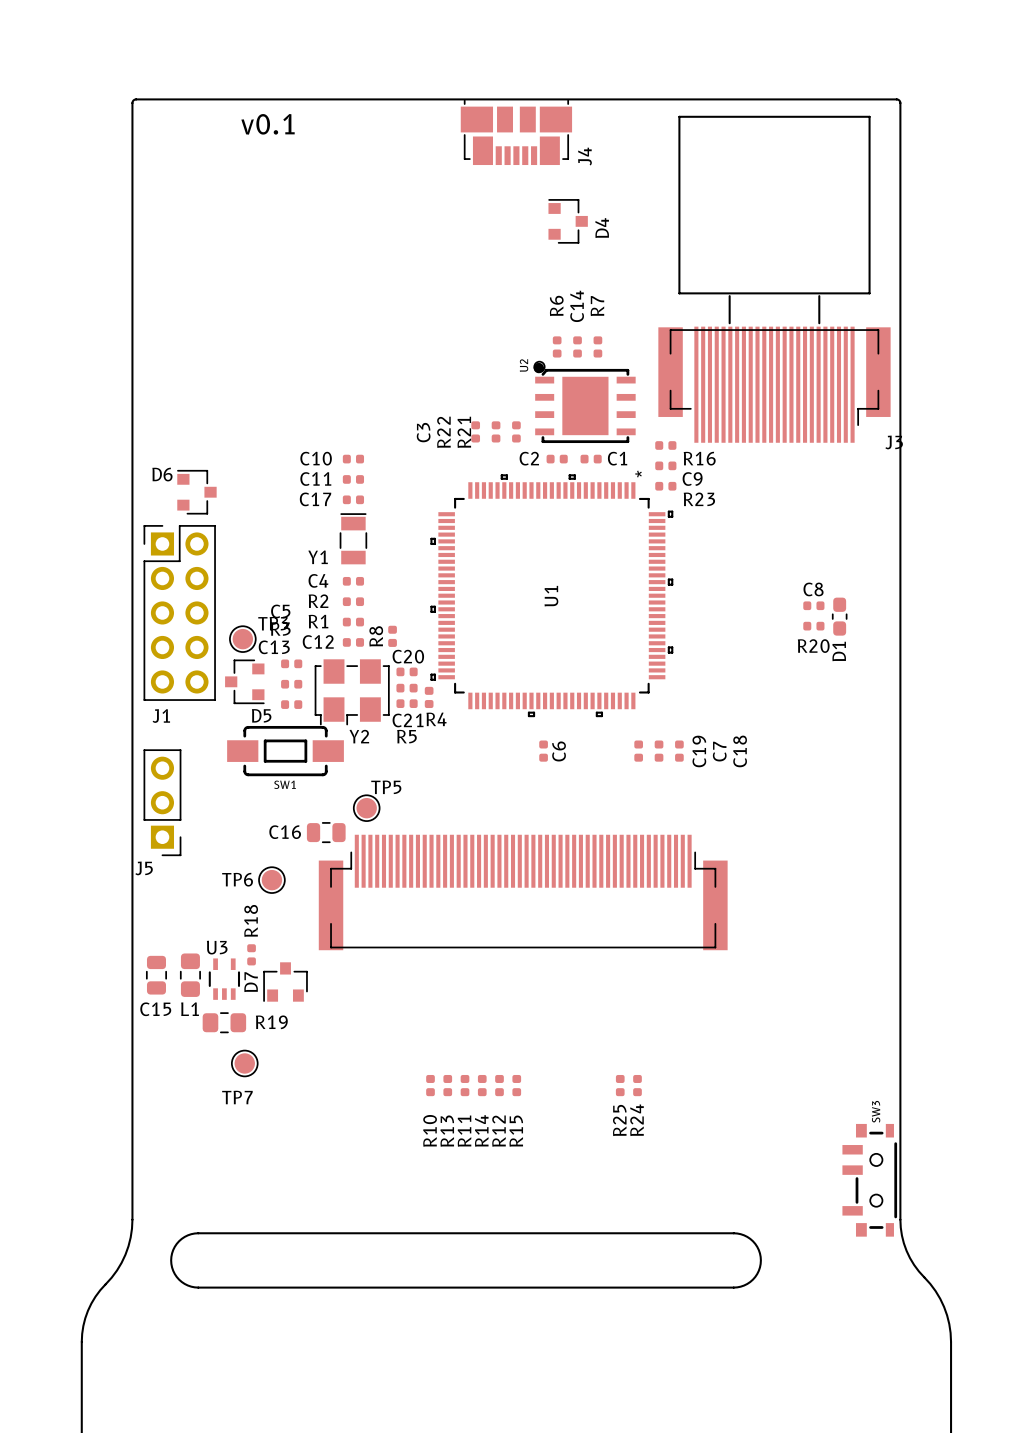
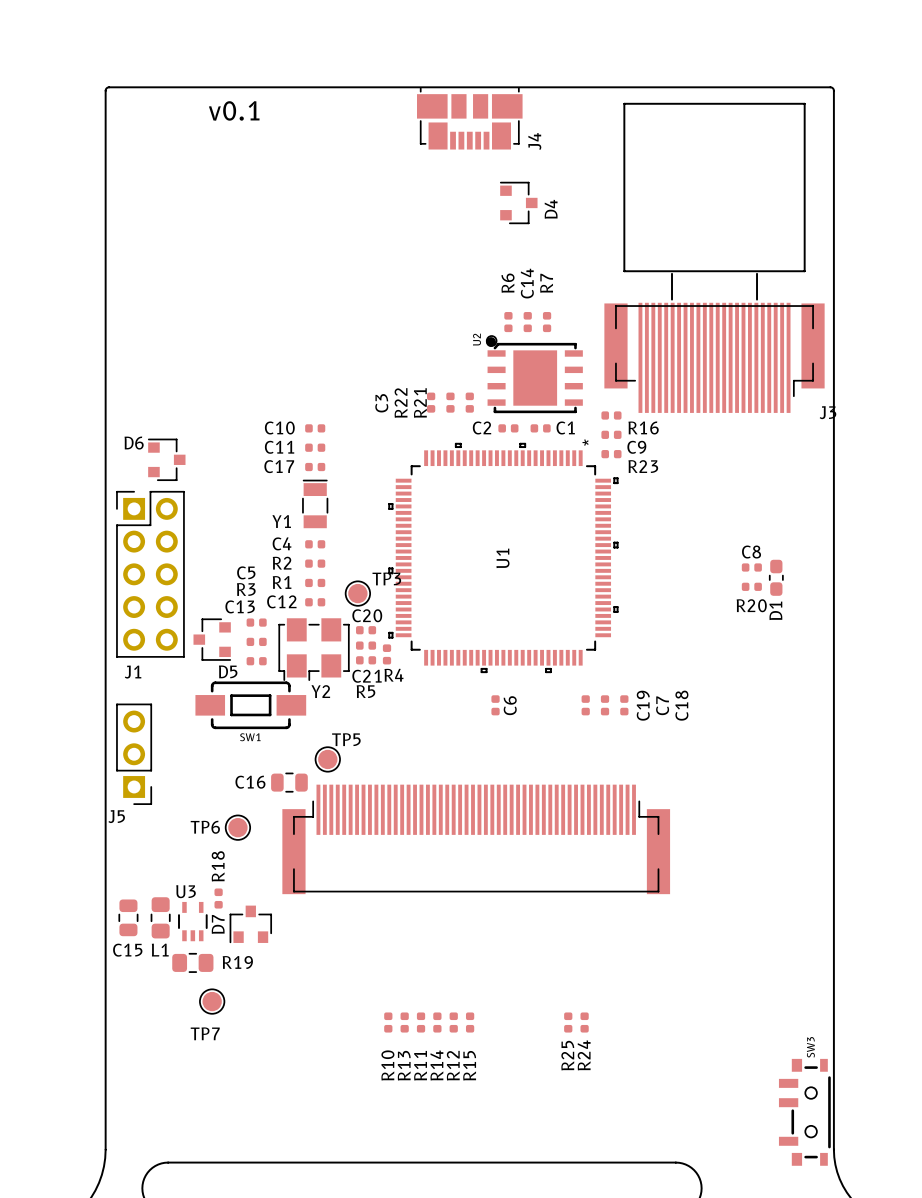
R8: (392, 636) -> none
TP3 position: (242, 639) -> (357, 593)

